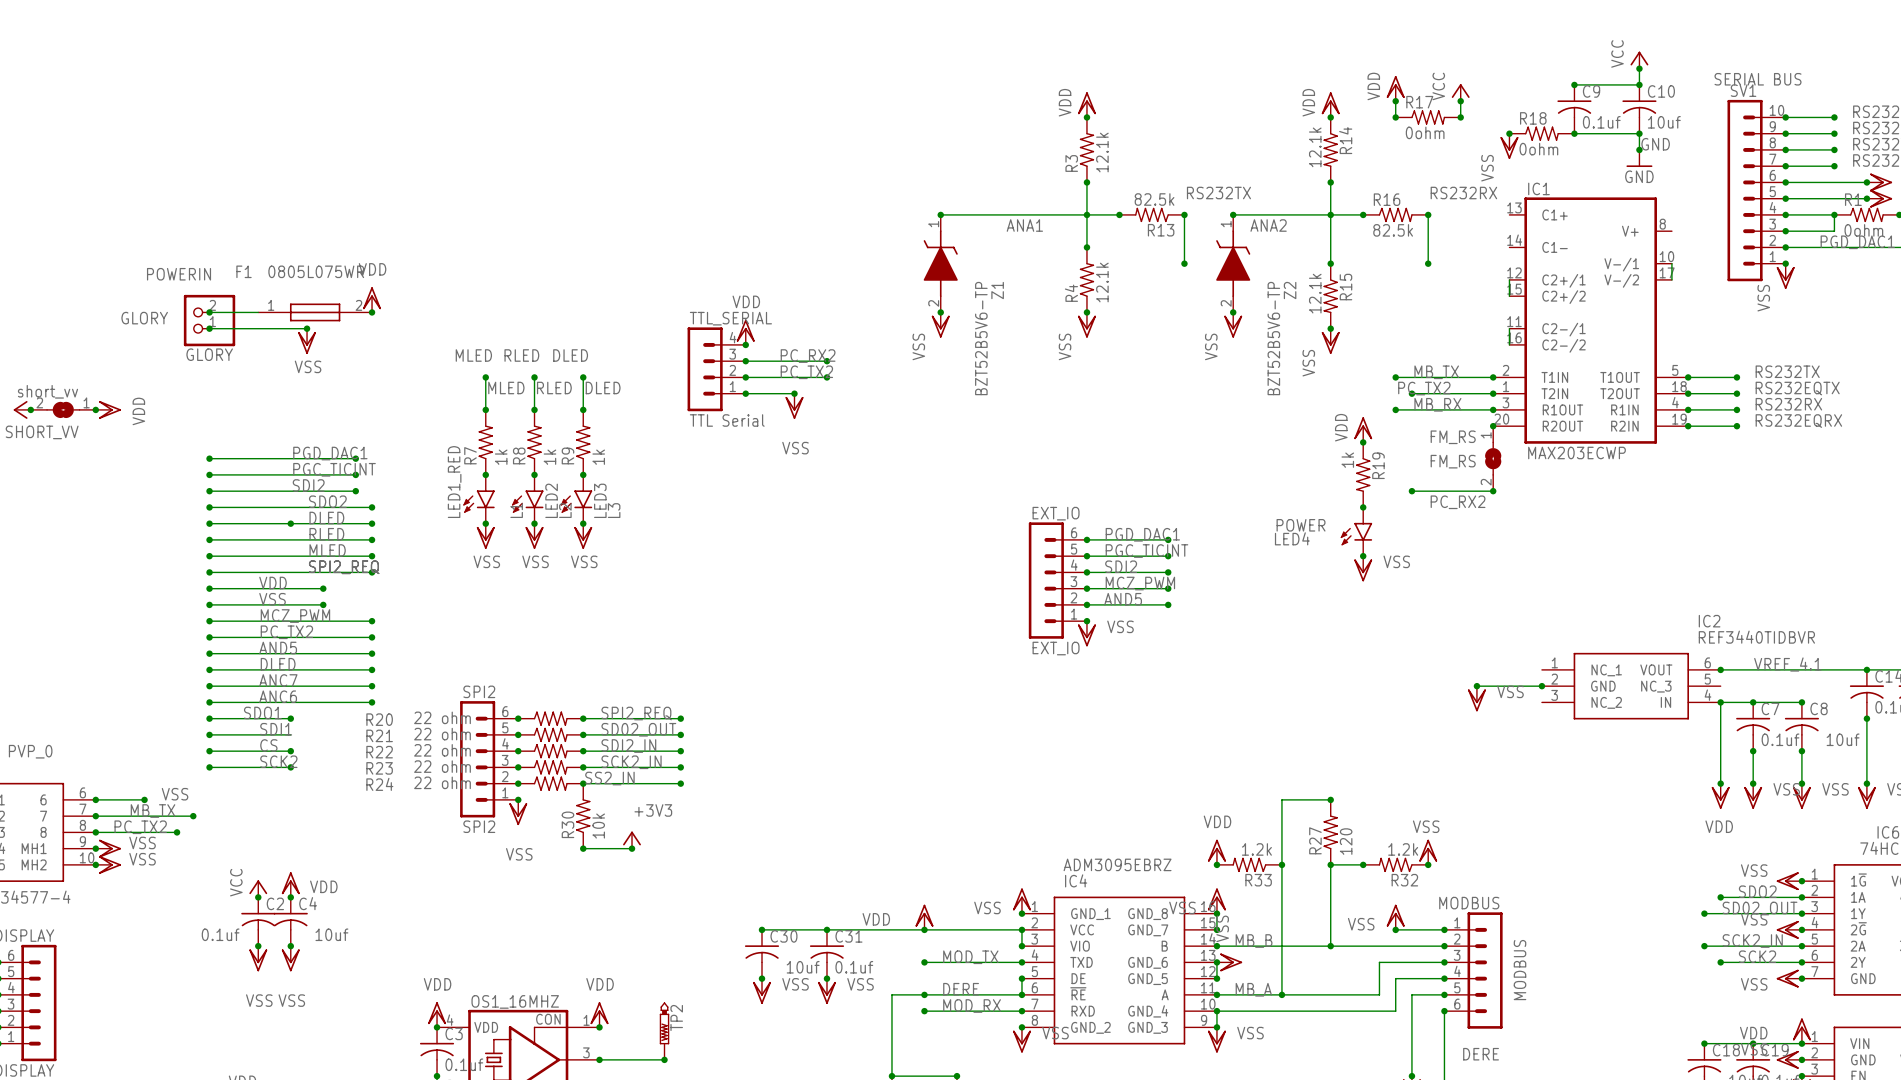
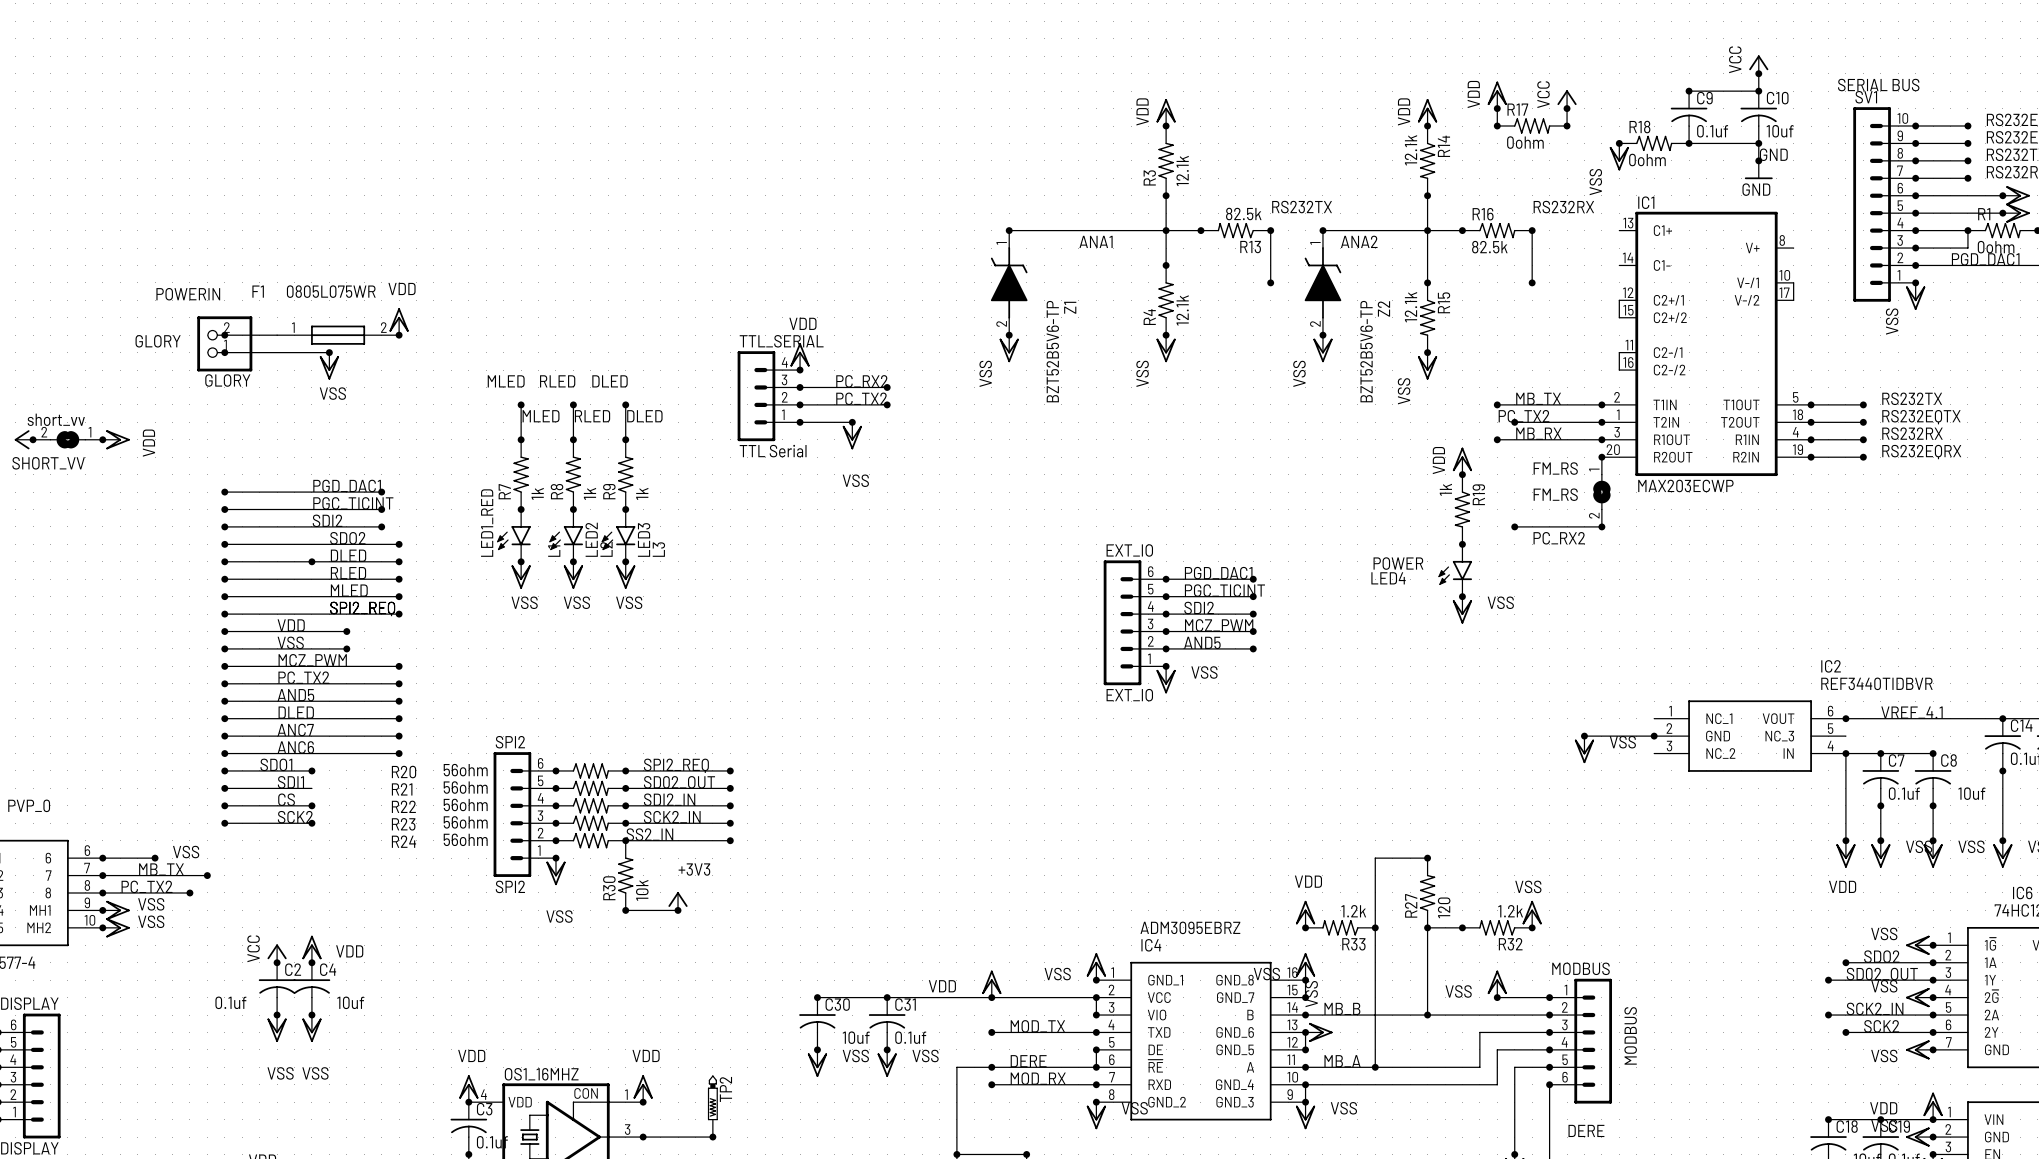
R20 value: 22 ohm (442, 717) -> 56ohm (465, 770)
R21 value: 22 ohm (442, 734) -> 56ohm (465, 787)
R22 value: 22 ohm (442, 750) -> 56ohm (465, 804)
R23 value: 22 ohm (442, 766) -> 56ohm (465, 822)
R24 value: 22 ohm (442, 782) -> 56ohm (465, 839)

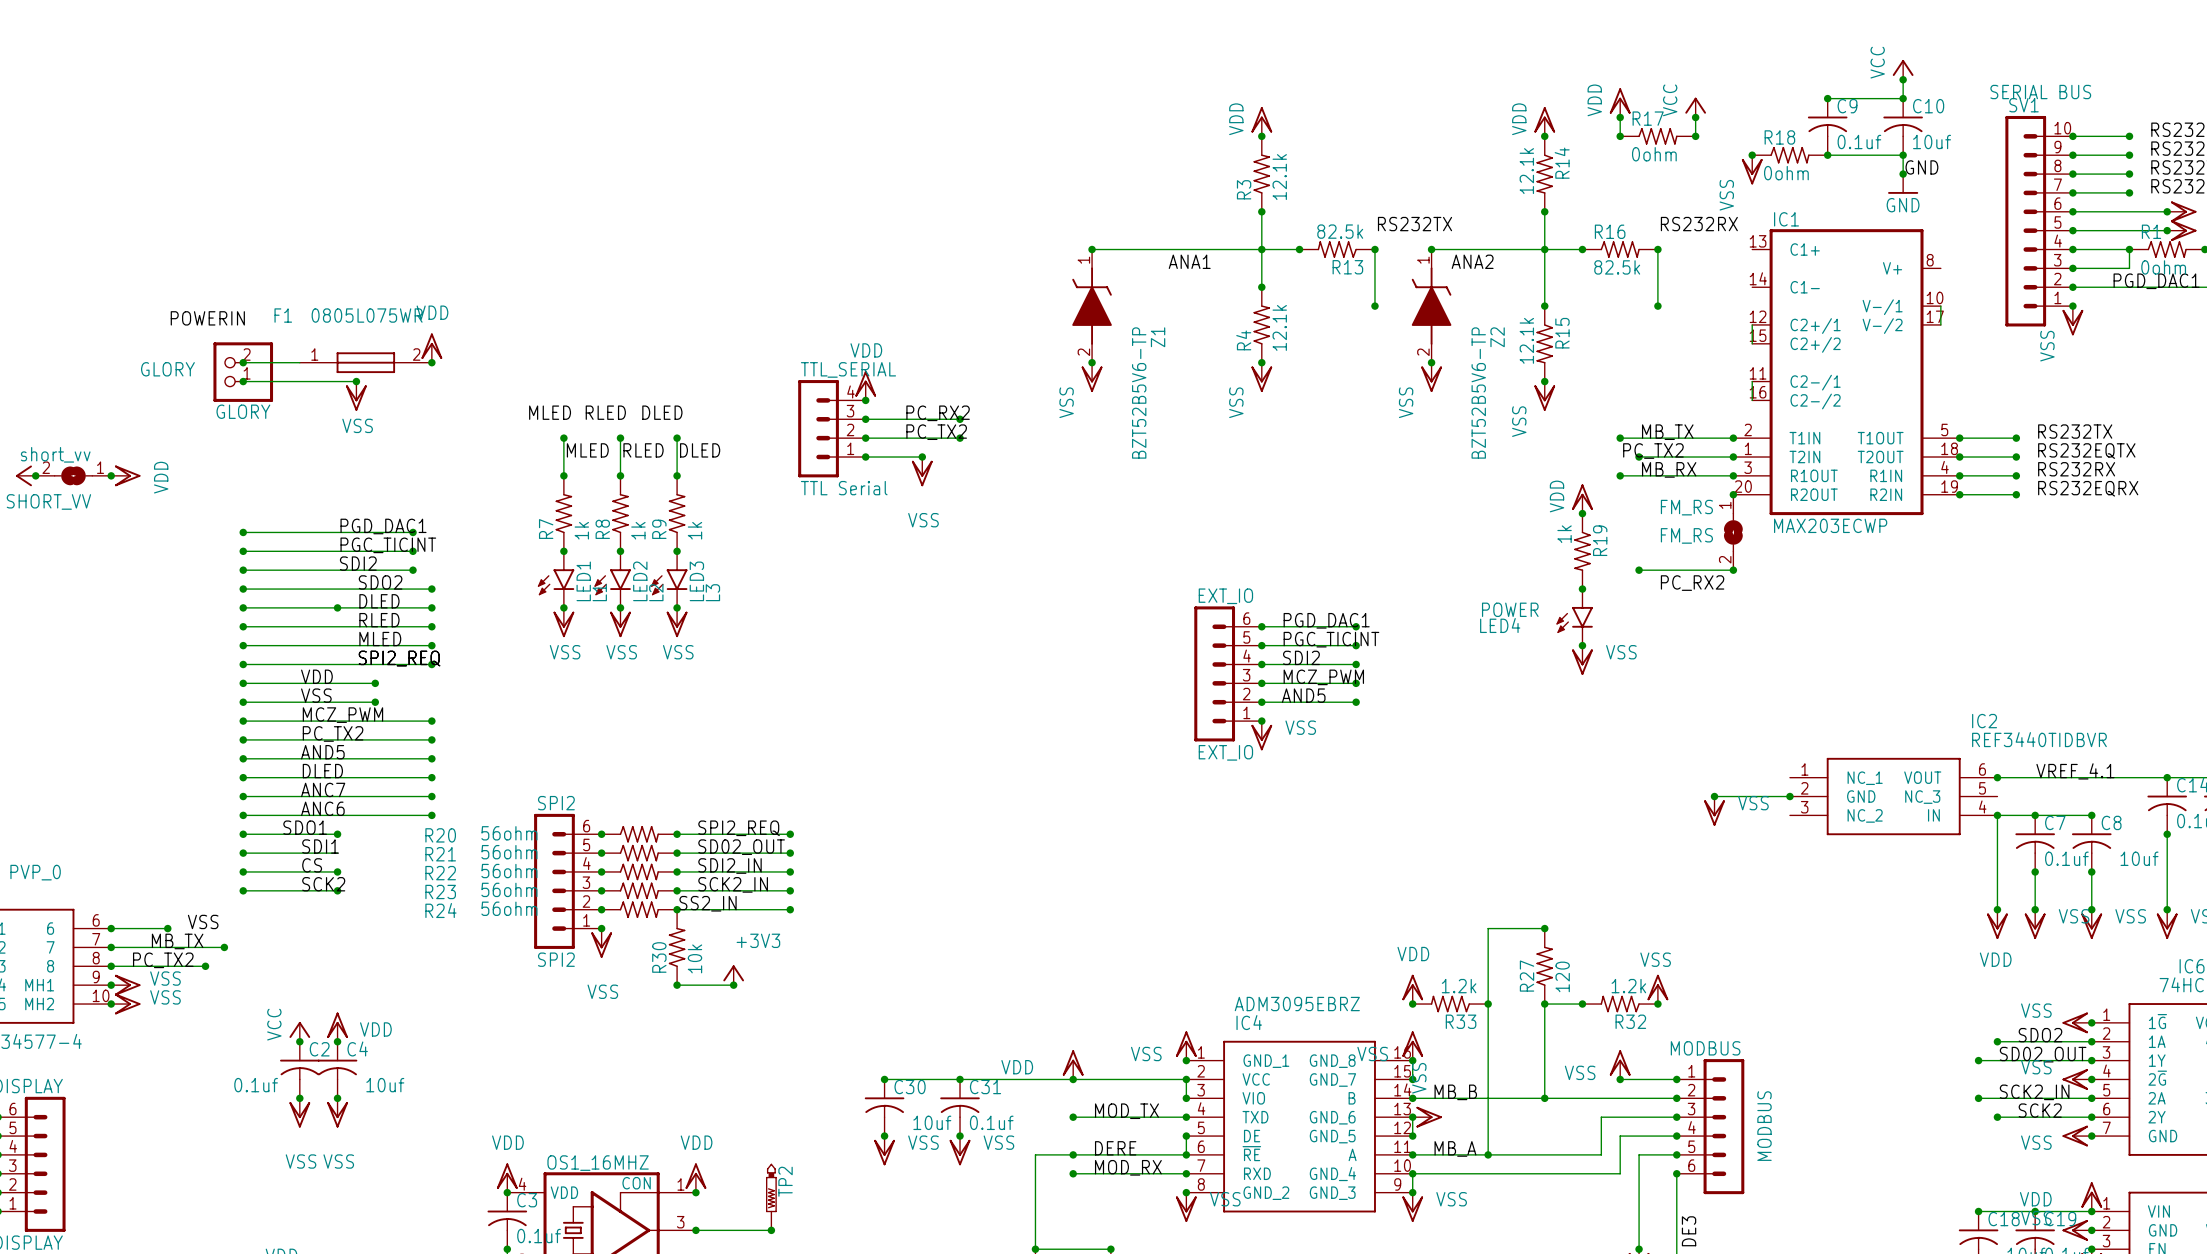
LED1_RED name: LED1_RED (487, 523) -> LED1 (583, 581)
label: DERE (1586, 1130) -> none
label: none -> DE3 (1689, 1231)

